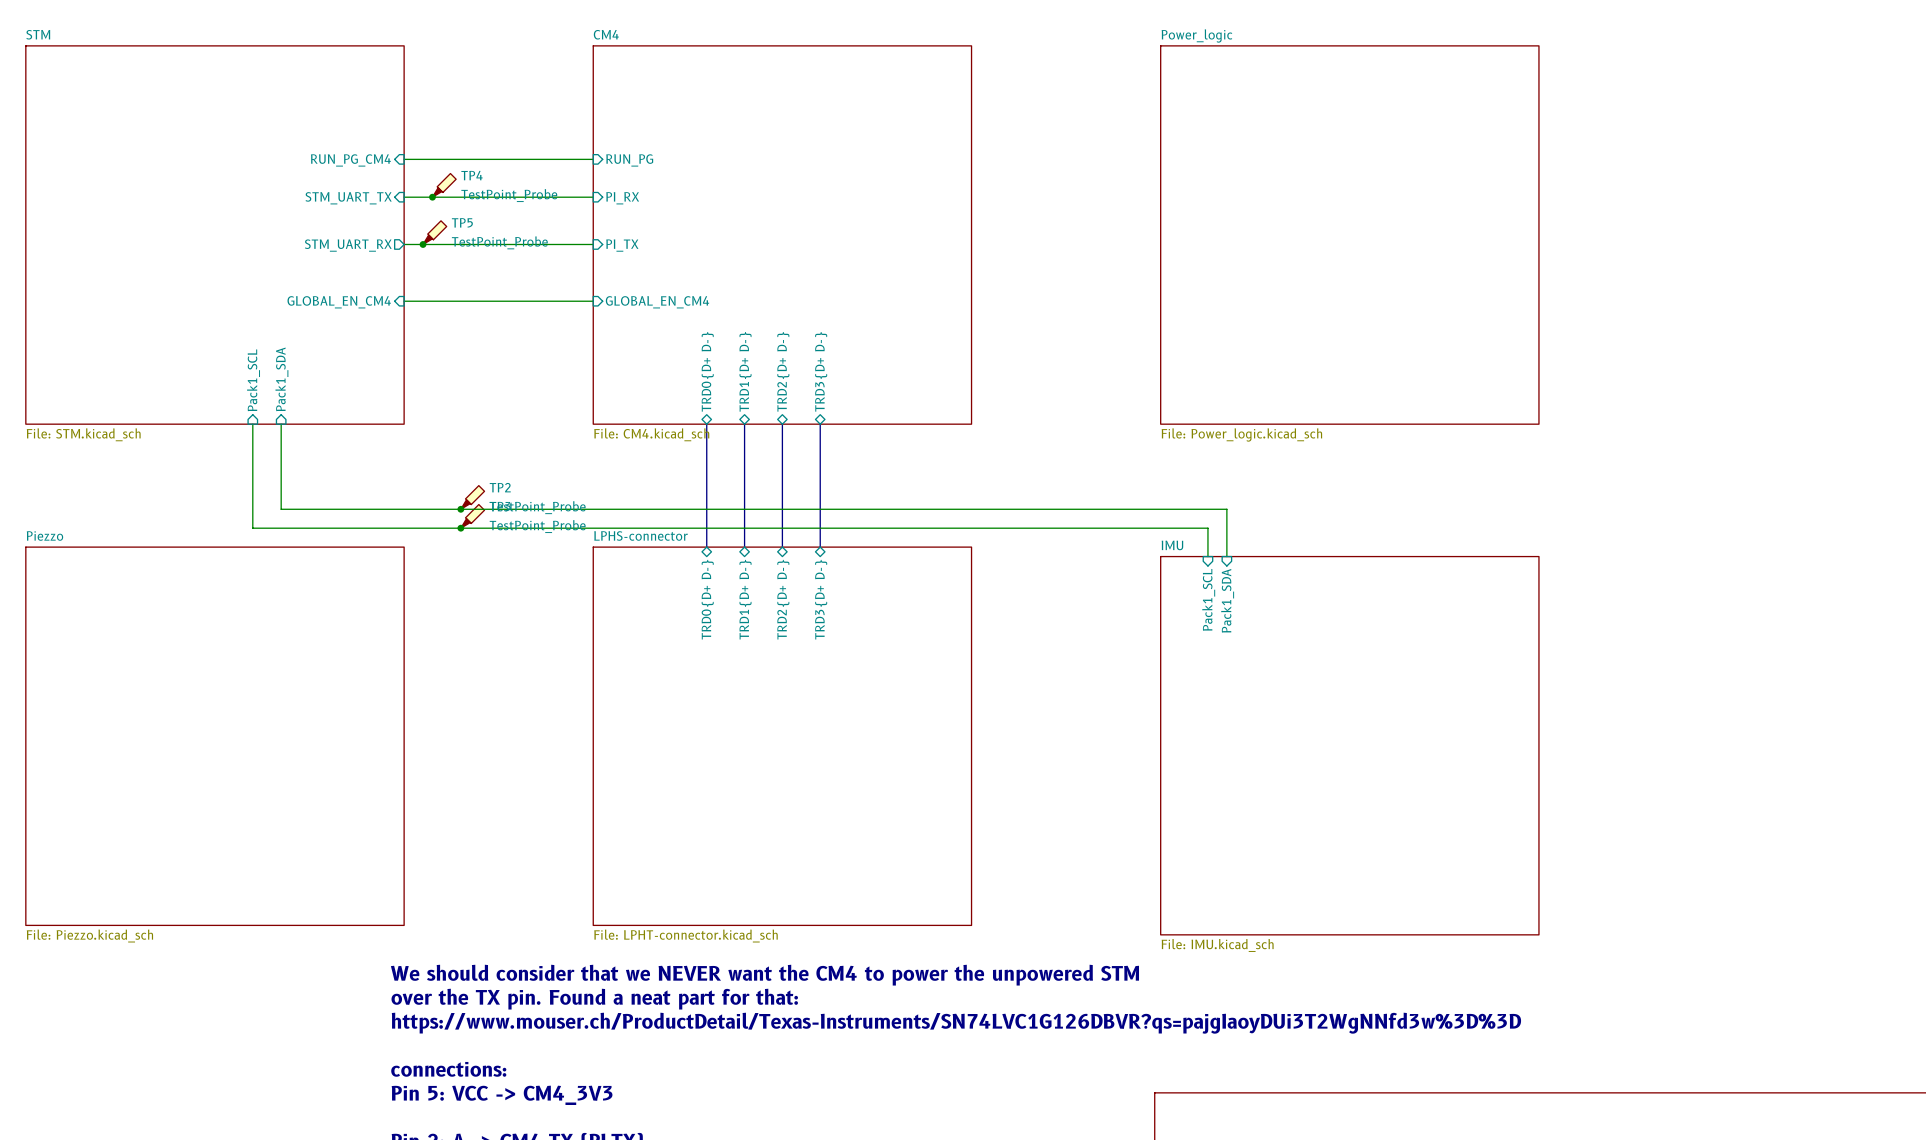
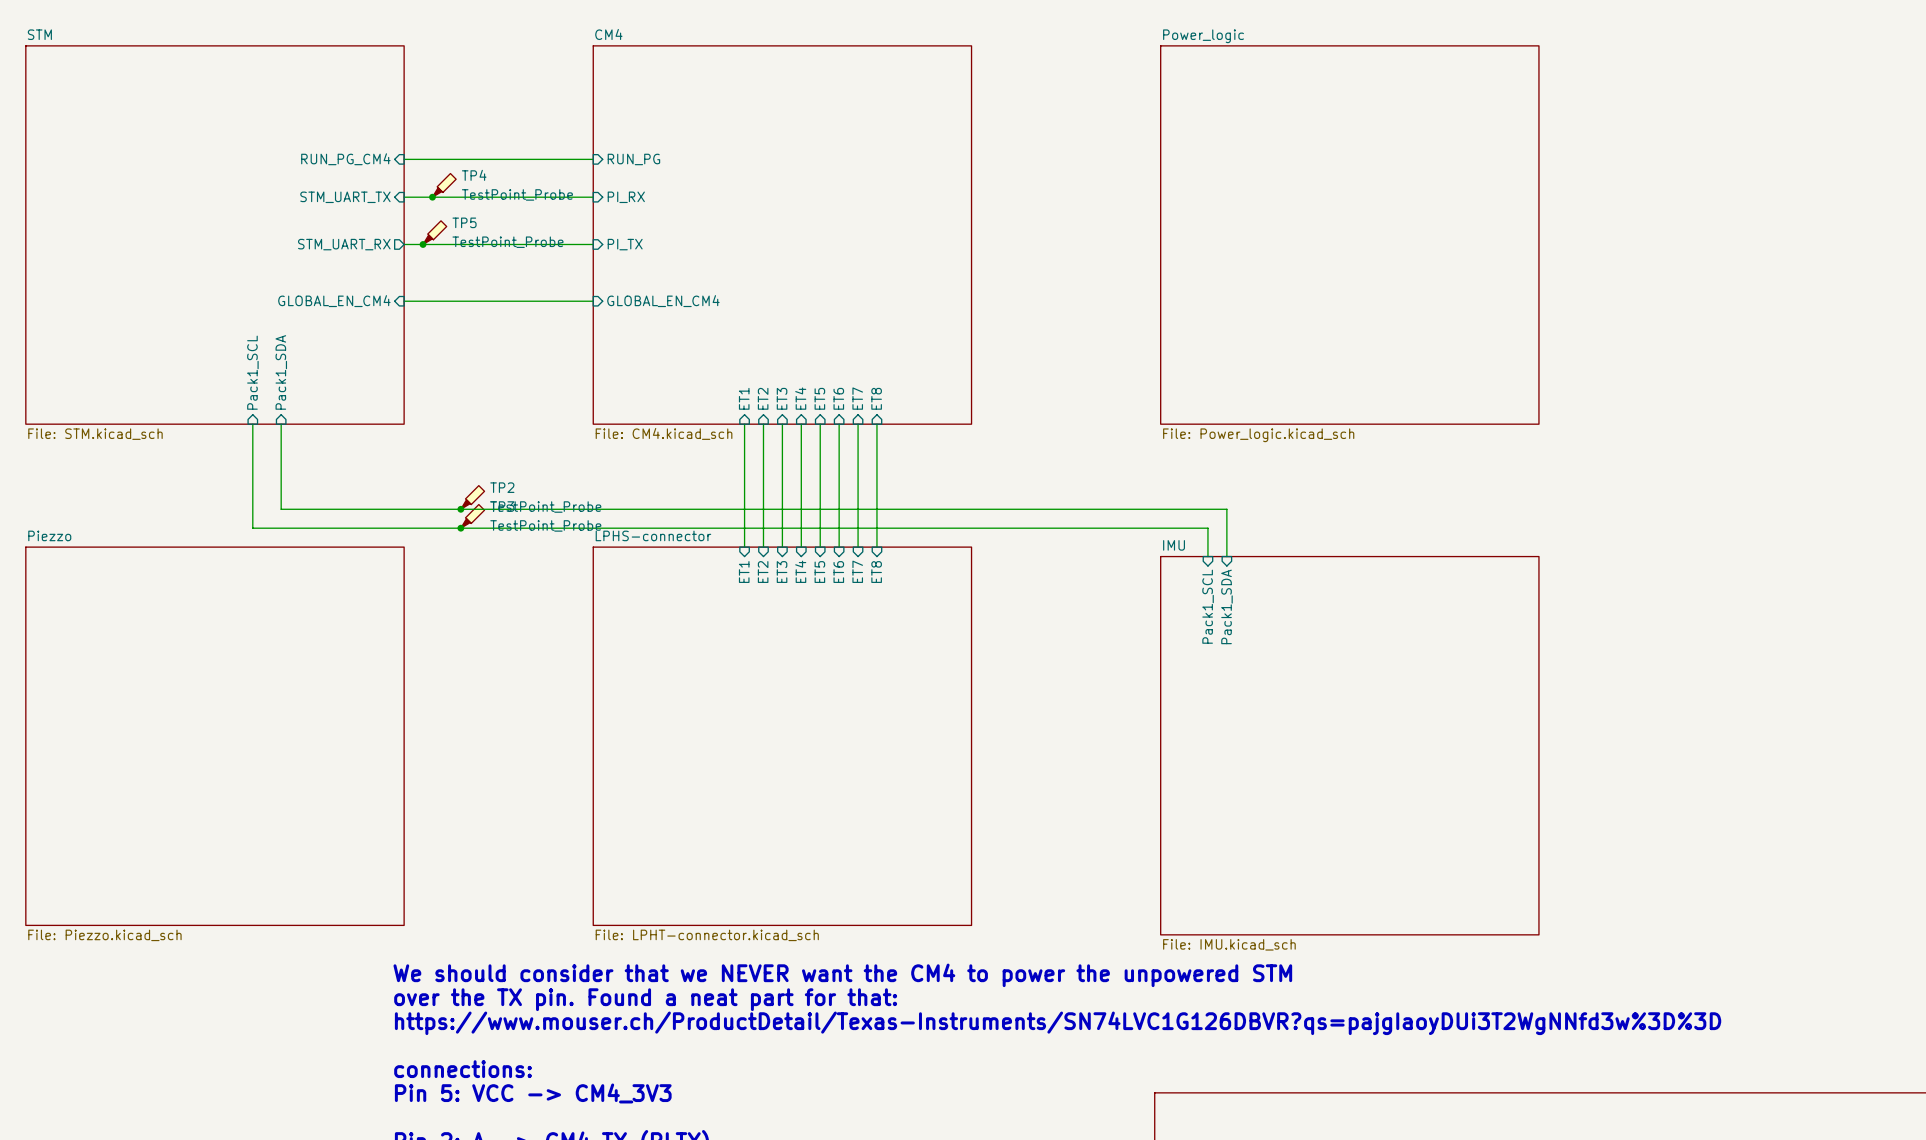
sheet pin: TRD0{D+ D-} (707, 371) -> none
sheet pin shape: bidirectional (745, 371) -> input (744, 398)
sheet pin: TRD1{D+ D-} (745, 371) -> ET1 (744, 398)
sheet pin shape: bidirectional (783, 371) -> input (782, 398)
sheet pin: TRD2{D+ D-} (783, 371) -> ET3 (782, 398)
sheet pin shape: bidirectional (821, 371) -> input (819, 398)
sheet pin: TRD3{D+ D-} (821, 371) -> ET5 (819, 398)
sheet pin: none -> ET2 (763, 398)
sheet pin: none -> ET4 (800, 398)
sheet pin: none -> ET6 (838, 398)
sheet pin: none -> ET7 (857, 398)
sheet pin: none -> ET8 (876, 398)
bus: (706, 424) (706, 547) -> none
bus: (744, 424) (744, 547) -> none
wire: none -> (763, 424) (763, 547)
bus: (782, 424) (782, 547) -> none
wire: none -> (801, 424) (801, 547)
bus: (820, 424) (820, 547) -> none
wire: none -> (839, 424) (839, 547)
wire: none -> (858, 424) (858, 547)
wire: none -> (876, 424) (876, 547)
sheet pin: none -> ET2 (763, 572)
sheet pin: none -> ET4 (800, 571)
sheet pin: none -> ET6 (838, 572)
sheet pin: none -> ET7 (857, 571)
sheet pin: none -> ET8 (876, 572)
sheet pin: TRD0{D+ D-} (707, 599) -> none
sheet pin shape: bidirectional (745, 599) -> input (744, 572)
sheet pin: TRD1{D+ D-} (745, 599) -> ET1 (744, 572)
sheet pin shape: bidirectional (783, 599) -> input (782, 572)
sheet pin: TRD2{D+ D-} (783, 599) -> ET3 (782, 572)
sheet pin shape: bidirectional (821, 599) -> input (819, 572)
sheet pin: TRD3{D+ D-} (821, 599) -> ET5 (819, 572)

